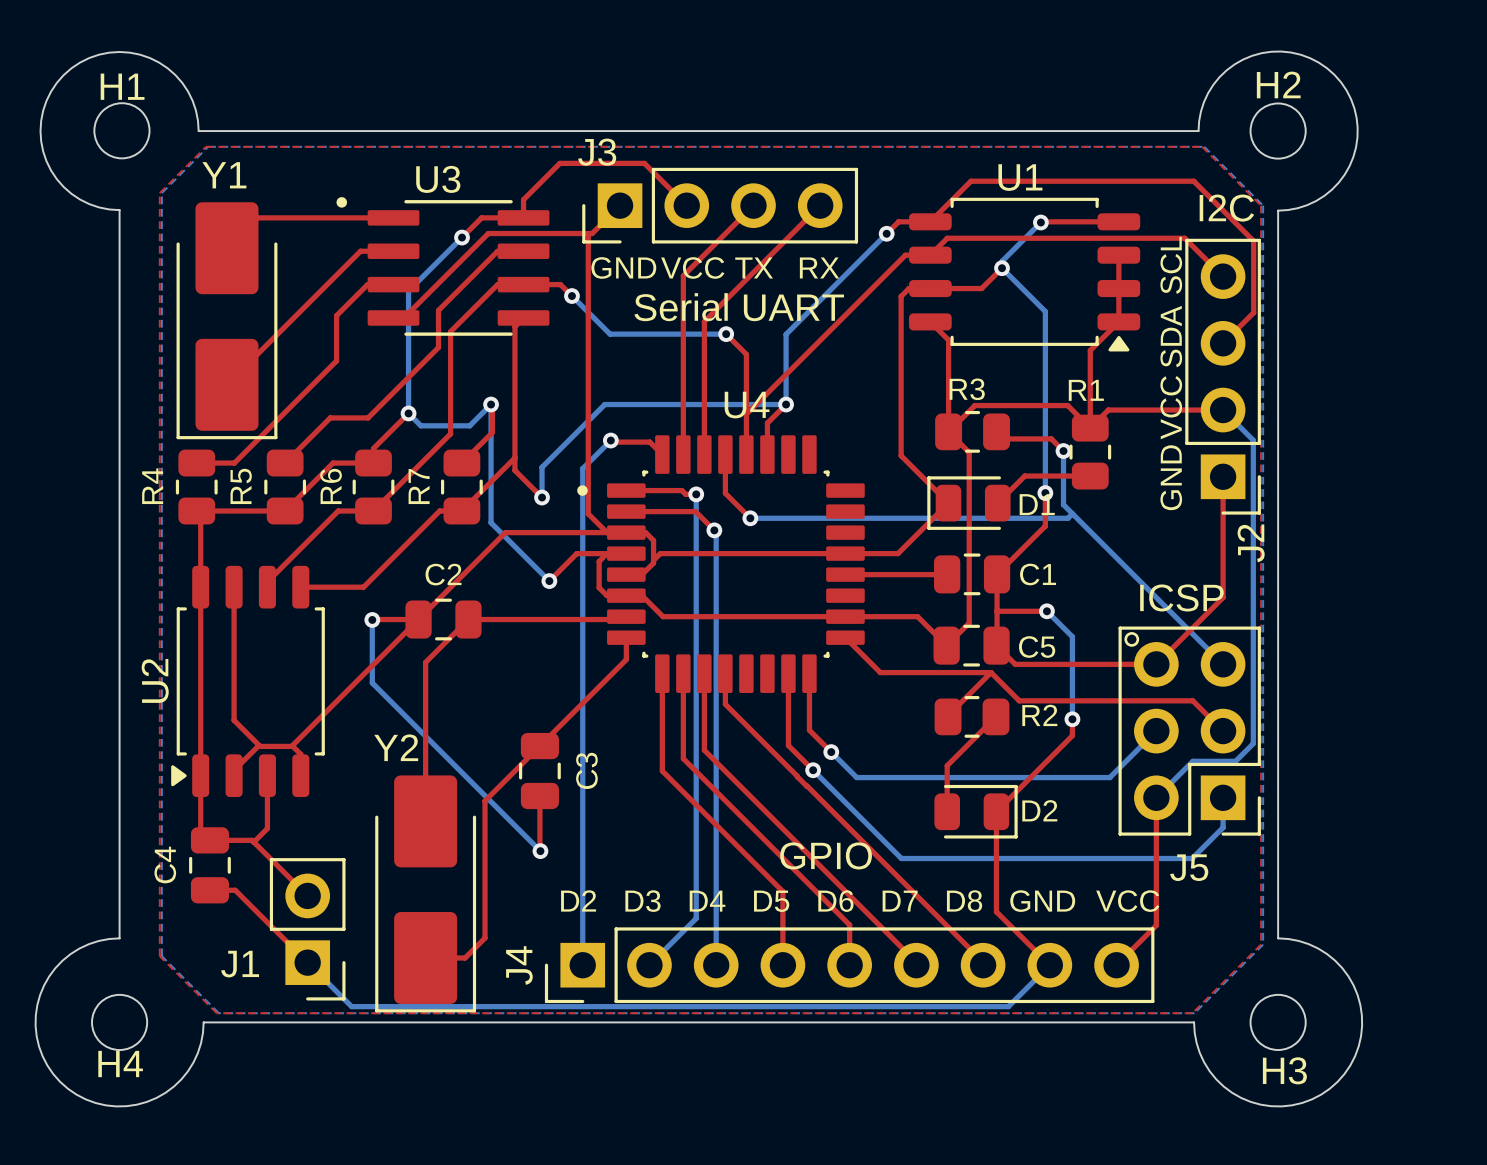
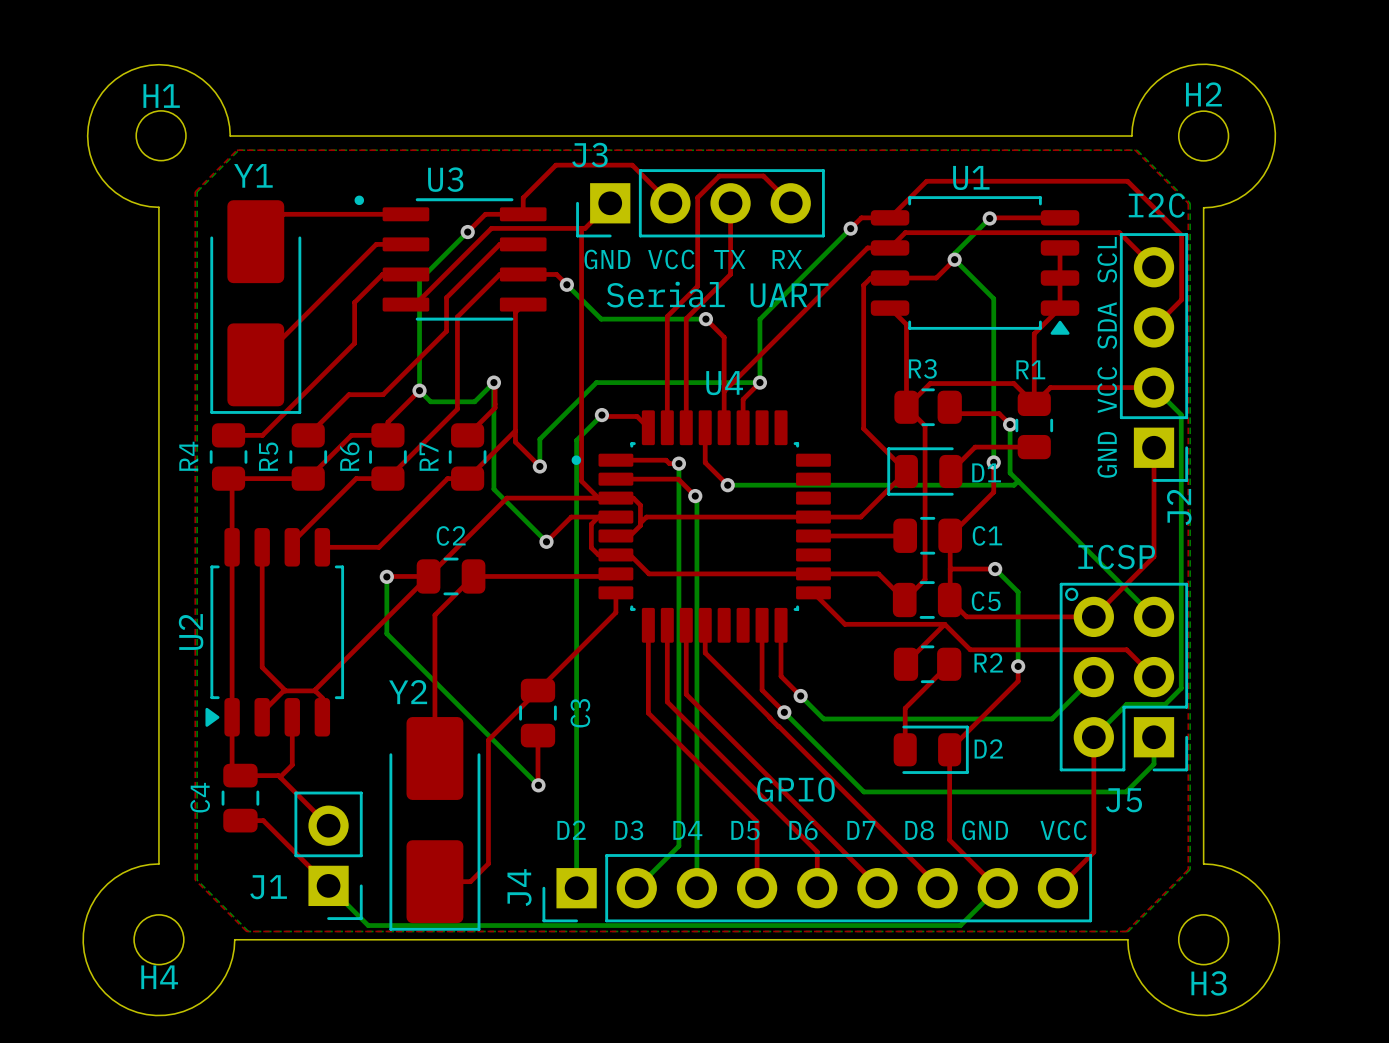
top track: (753, 205) (683, 275) (683, 331) -> (730, 203) (730, 274) (686, 318)
top track: (820, 205) (704, 321) (704, 333) -> (790, 203) (763, 176) (719, 176) (697, 197) (697, 286) (667, 316)

